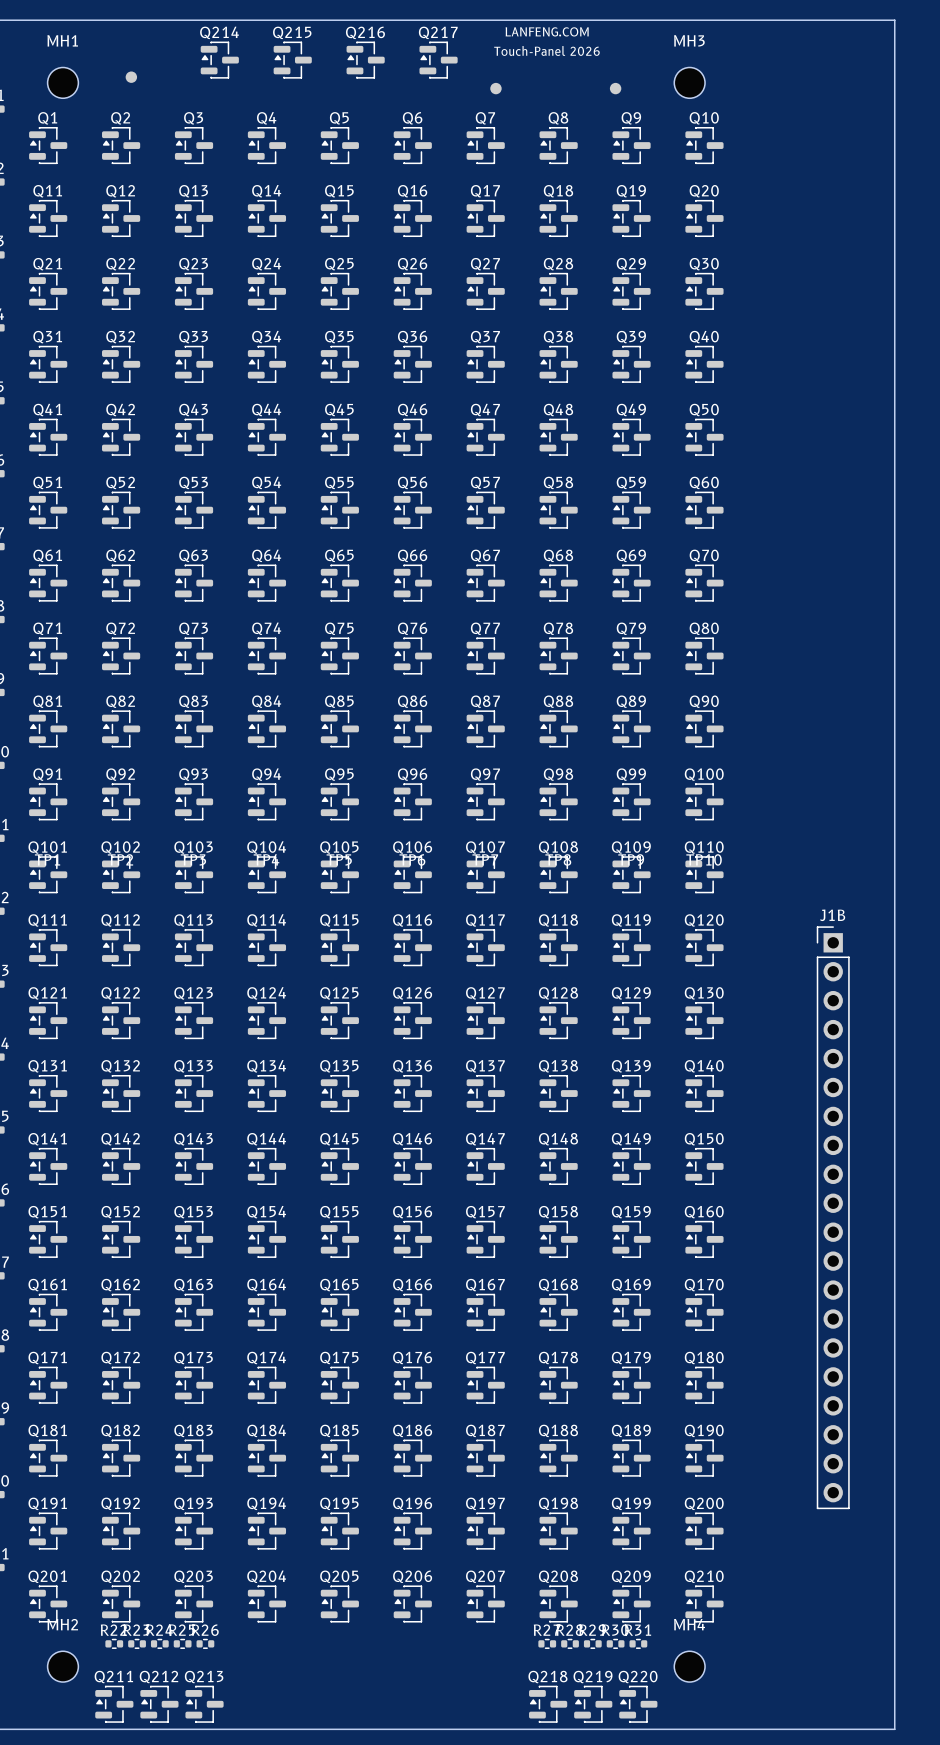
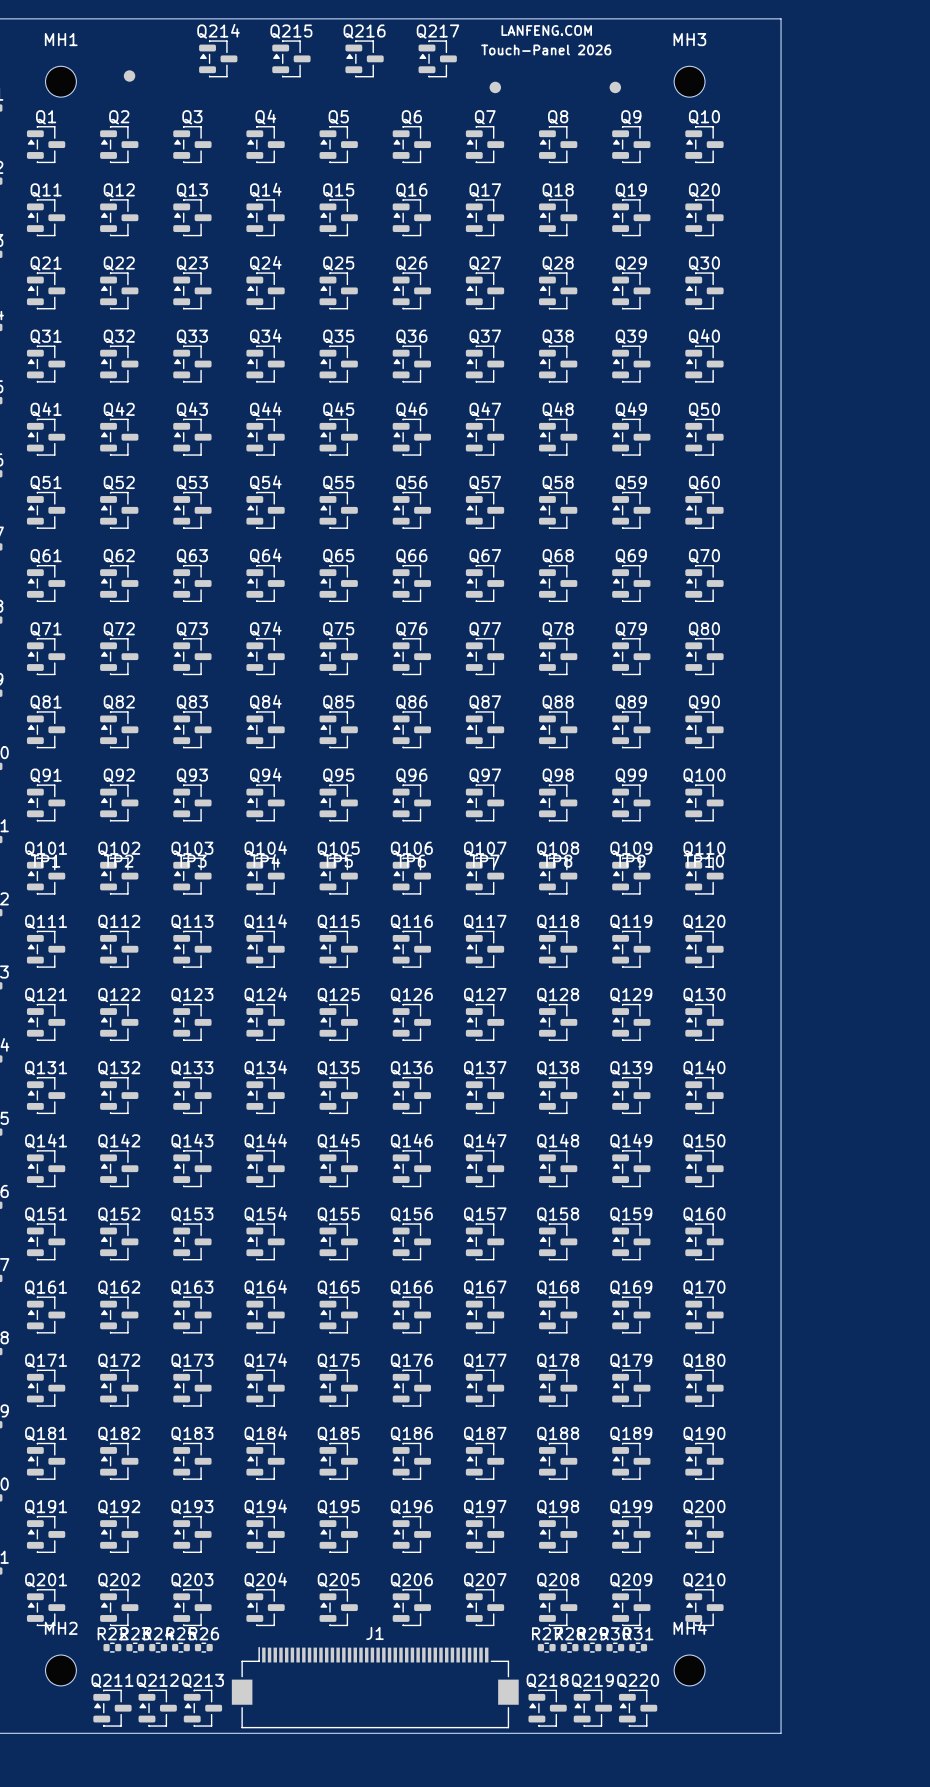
board edge: (780, 20) (894, 20) (894, 1729) (780, 1729) -> (781, 18) (781, 1733)
J1B: (833, 1217) -> none
J1: none -> (375, 1687)

